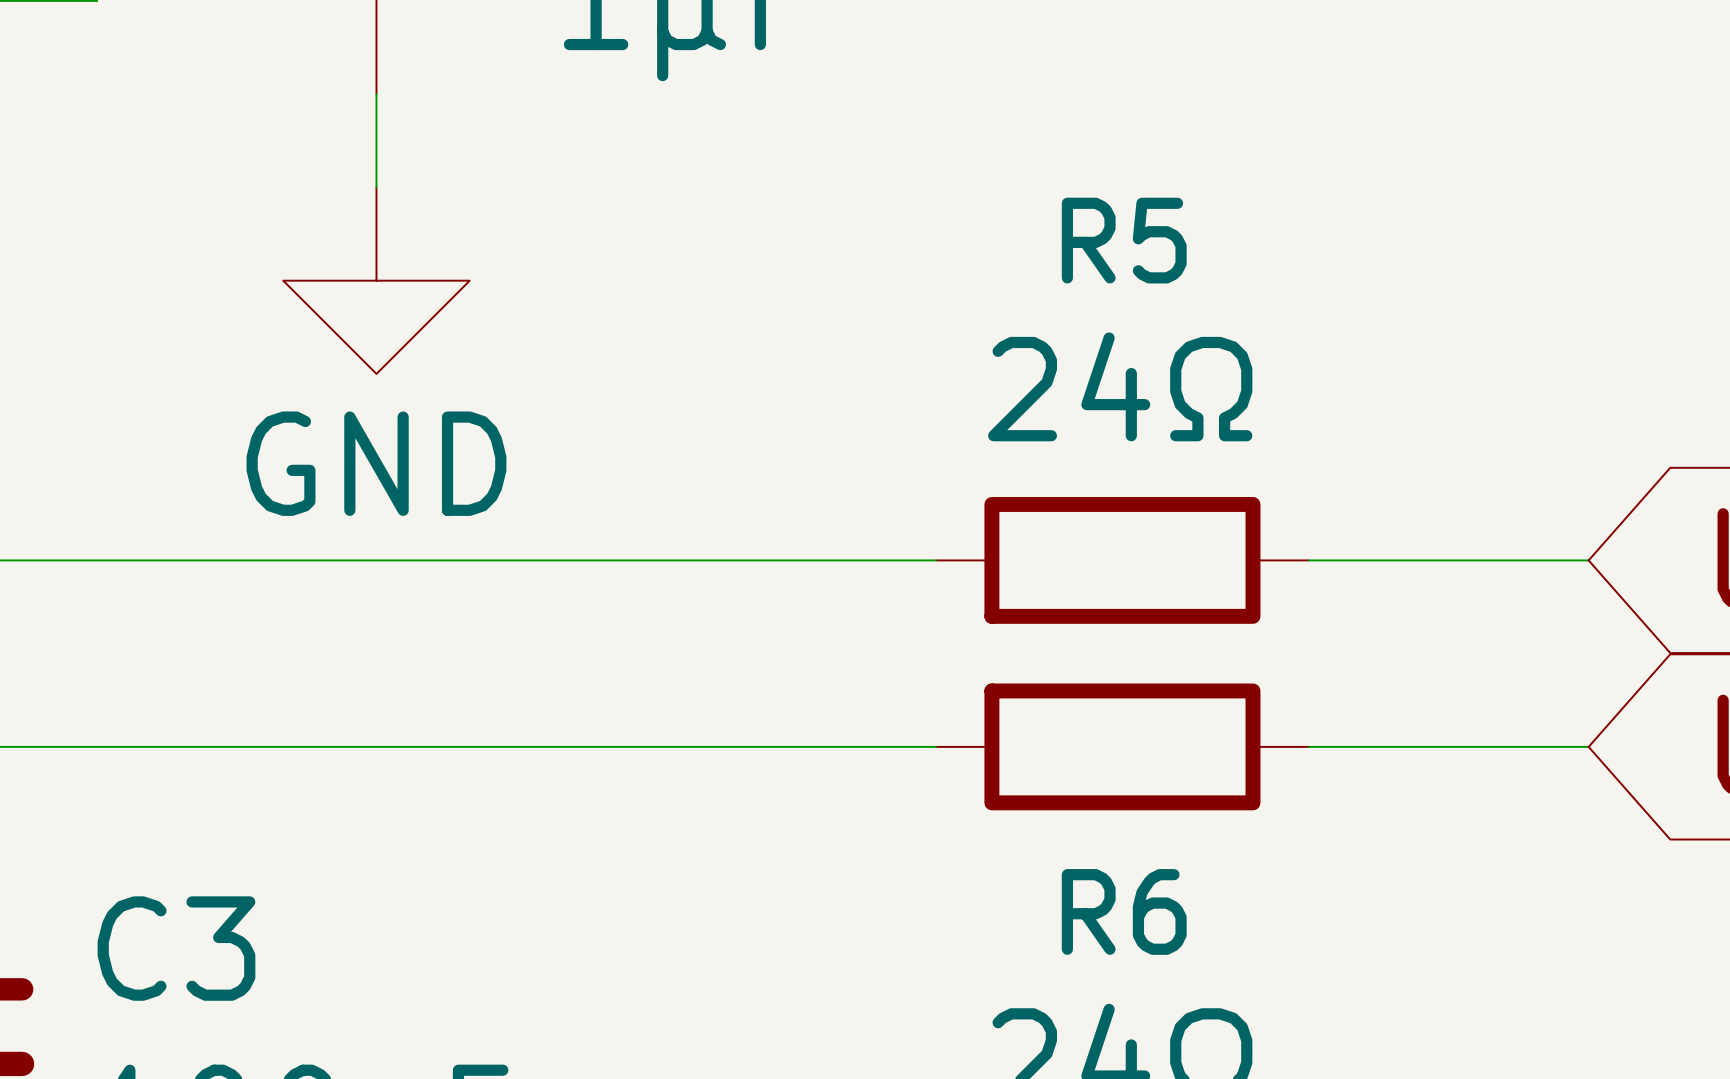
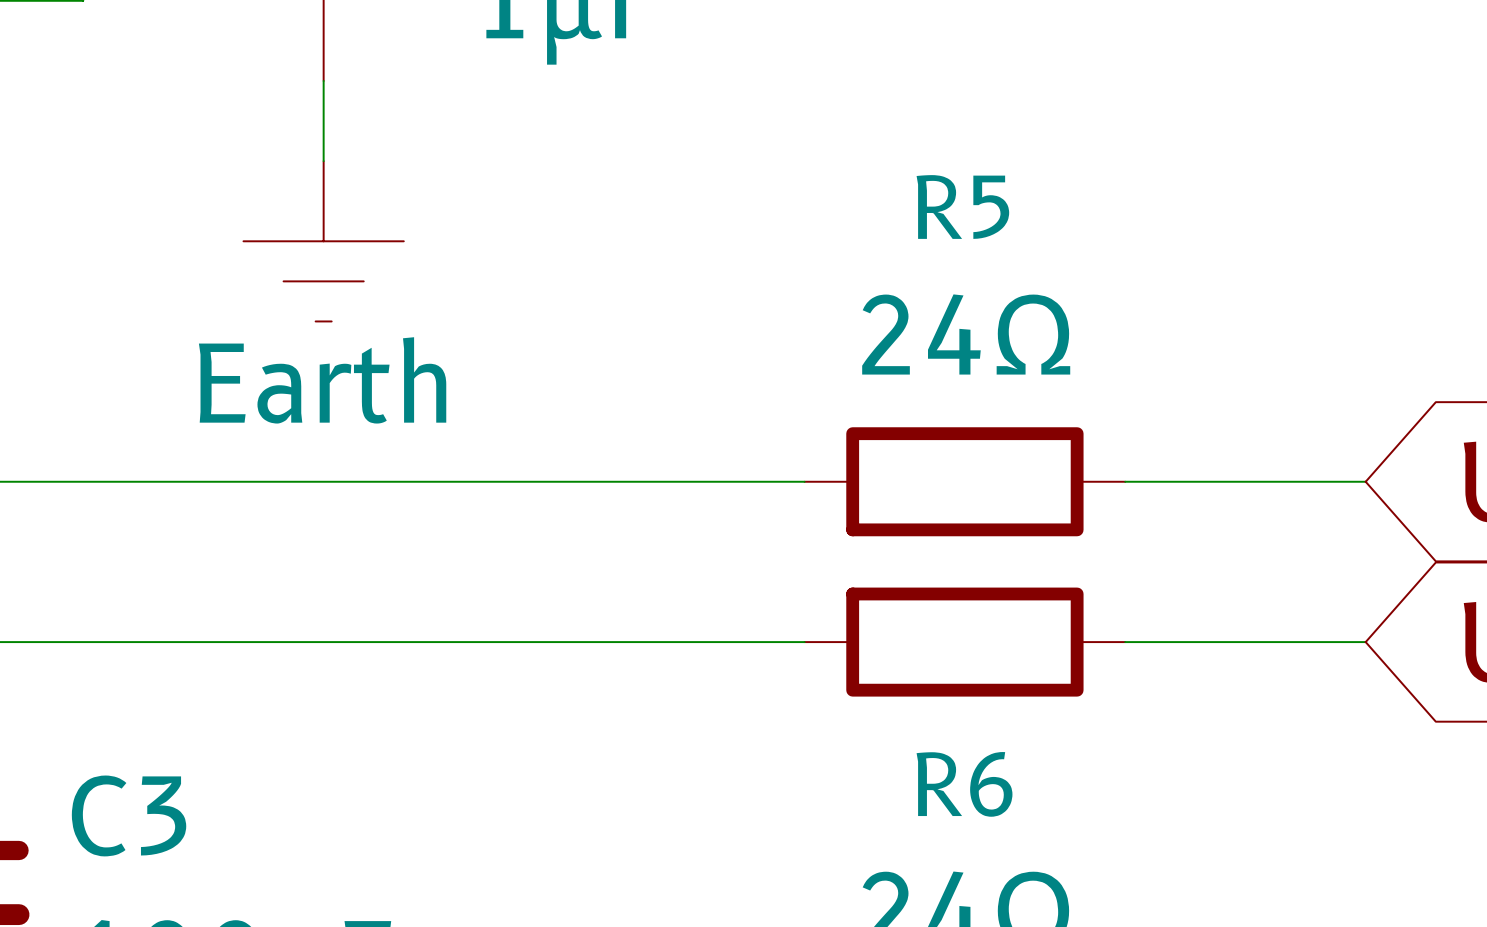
power symbol: GND (376, 280) -> Earth (323, 241)

